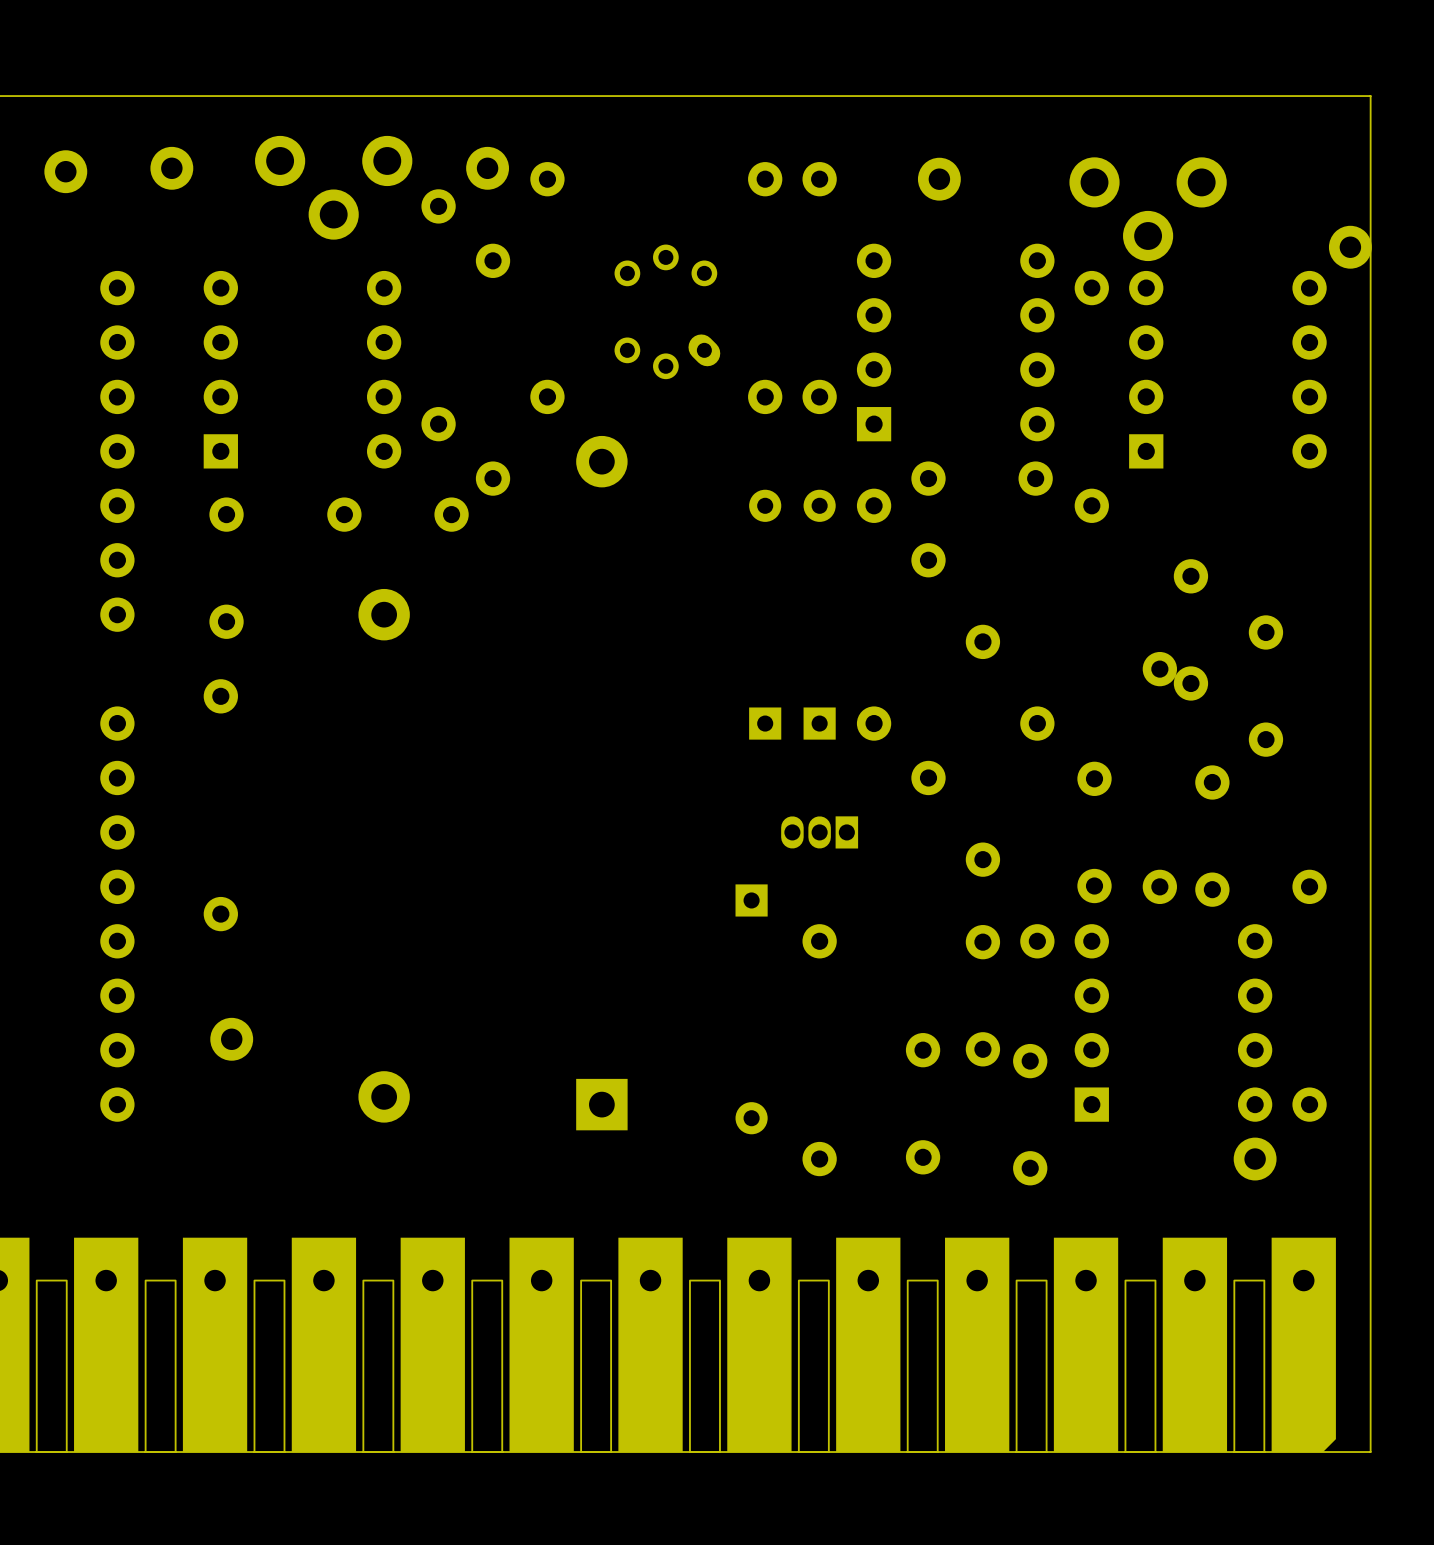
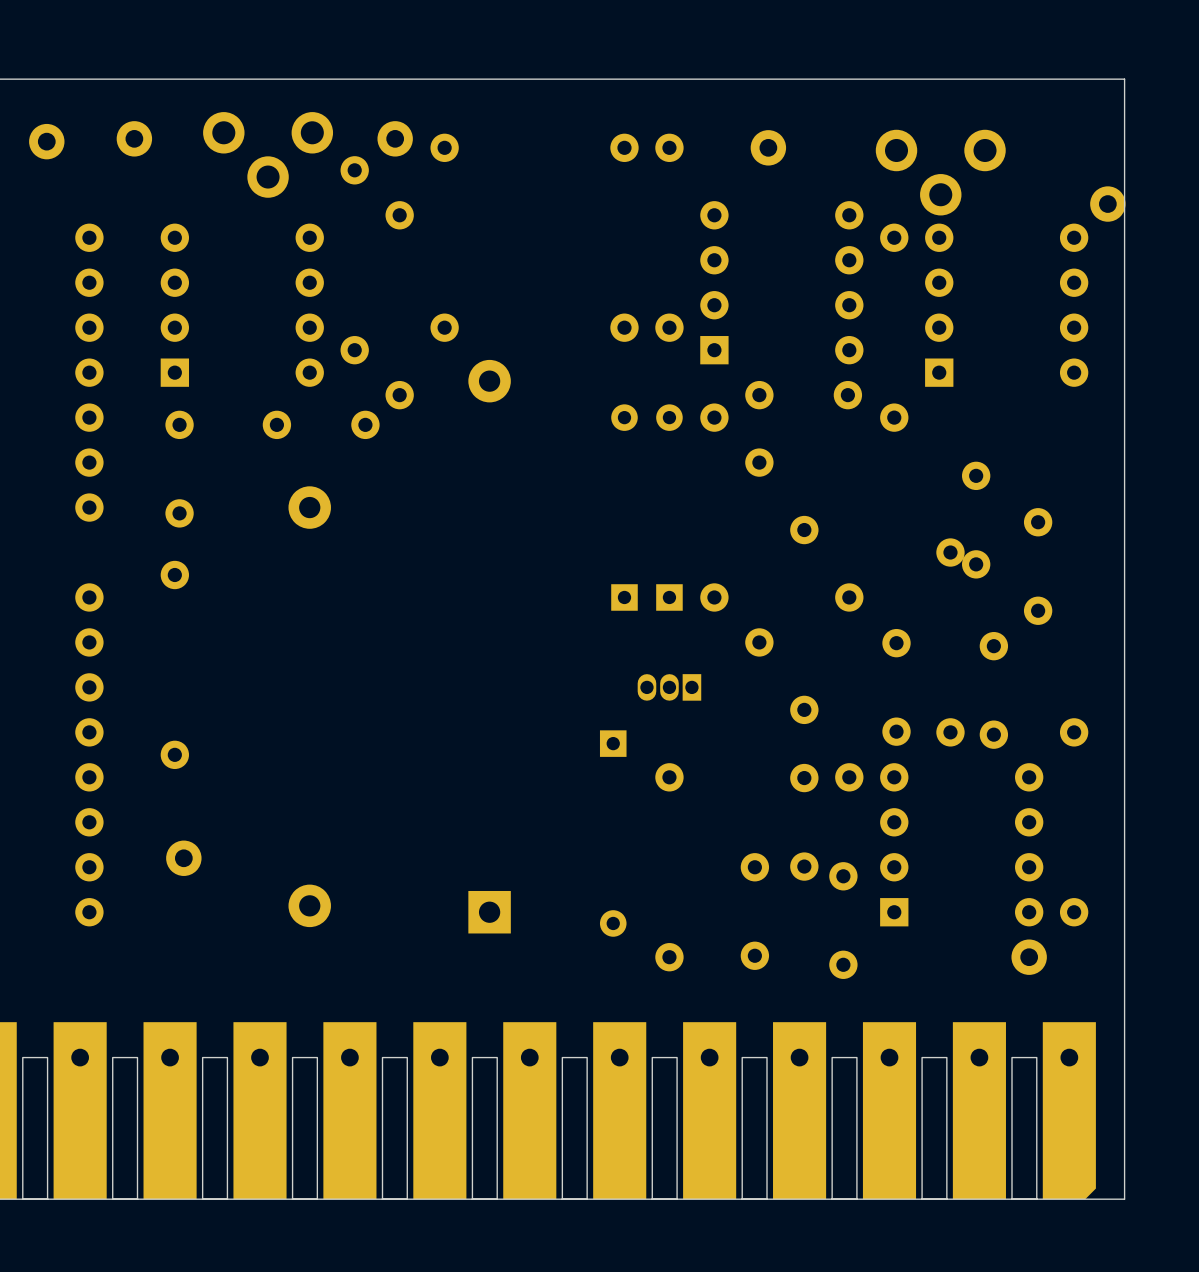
part: (667, 311) -> none

